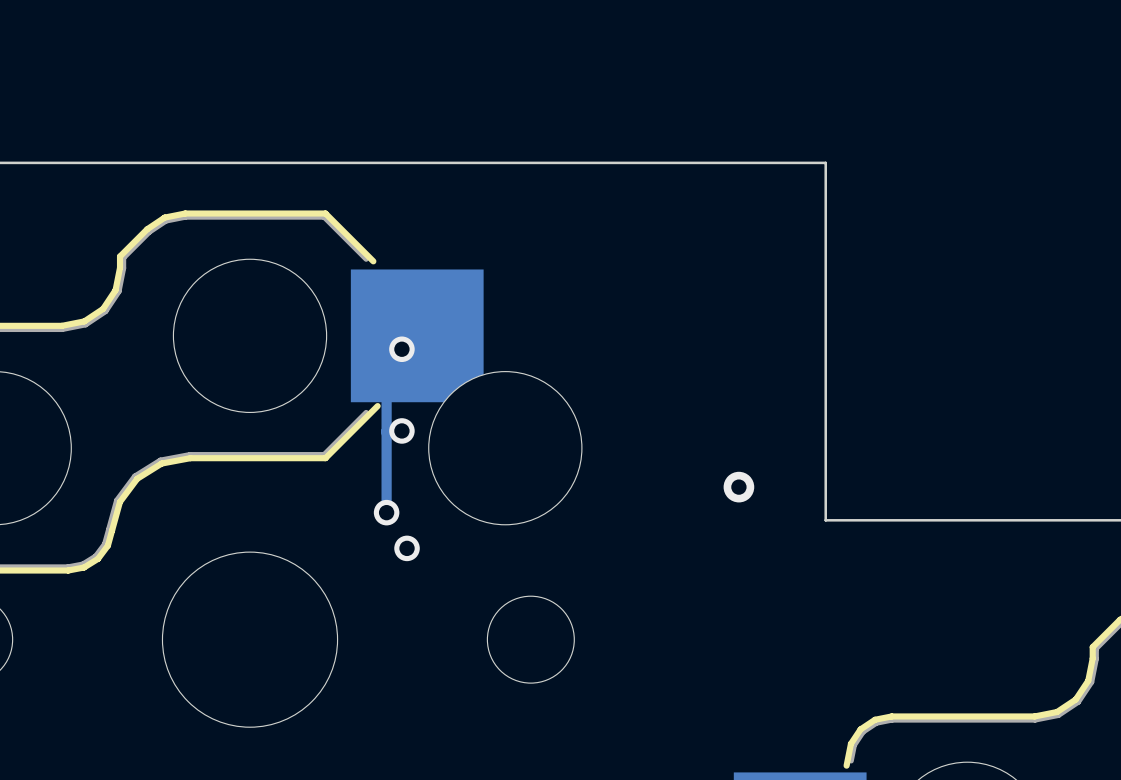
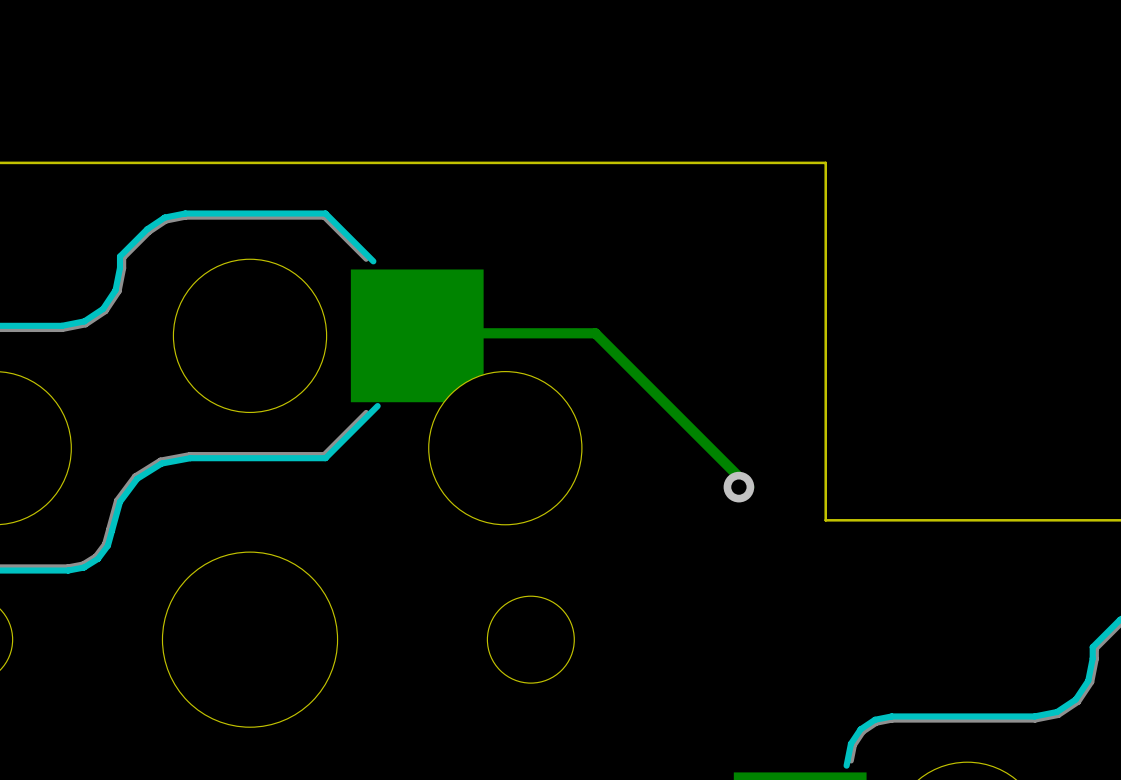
track: none -> (428, 333) (595, 333) (749, 487) (738, 487)
track: (417, 335) (417, 333) (386, 364) (386, 512) -> none
via: (401, 349) -> none
via: (401, 430) -> none
via: (386, 512) -> none
via: (407, 548) -> none

